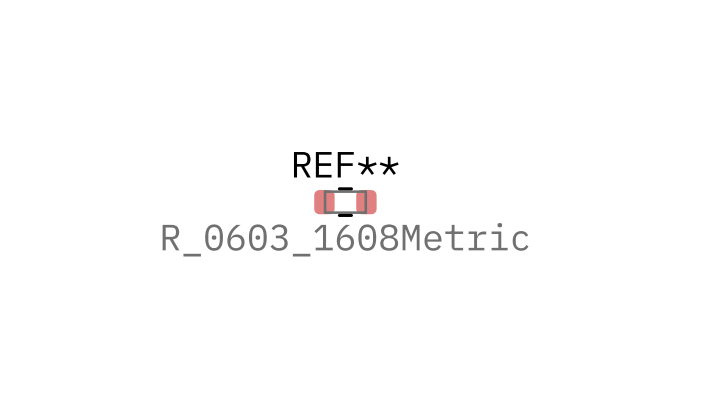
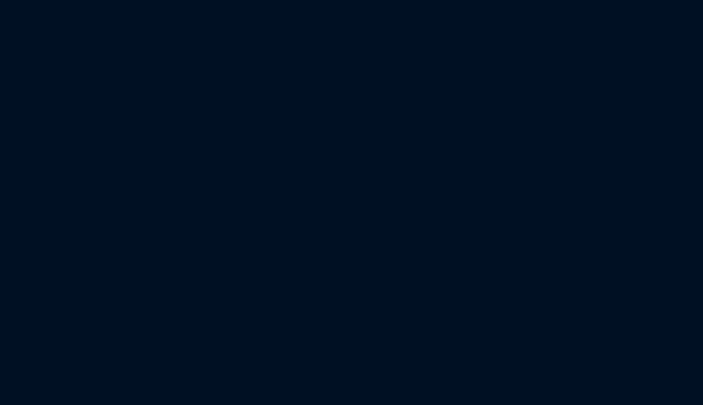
REF**: R_0603_1608Metric (345, 202) -> none

